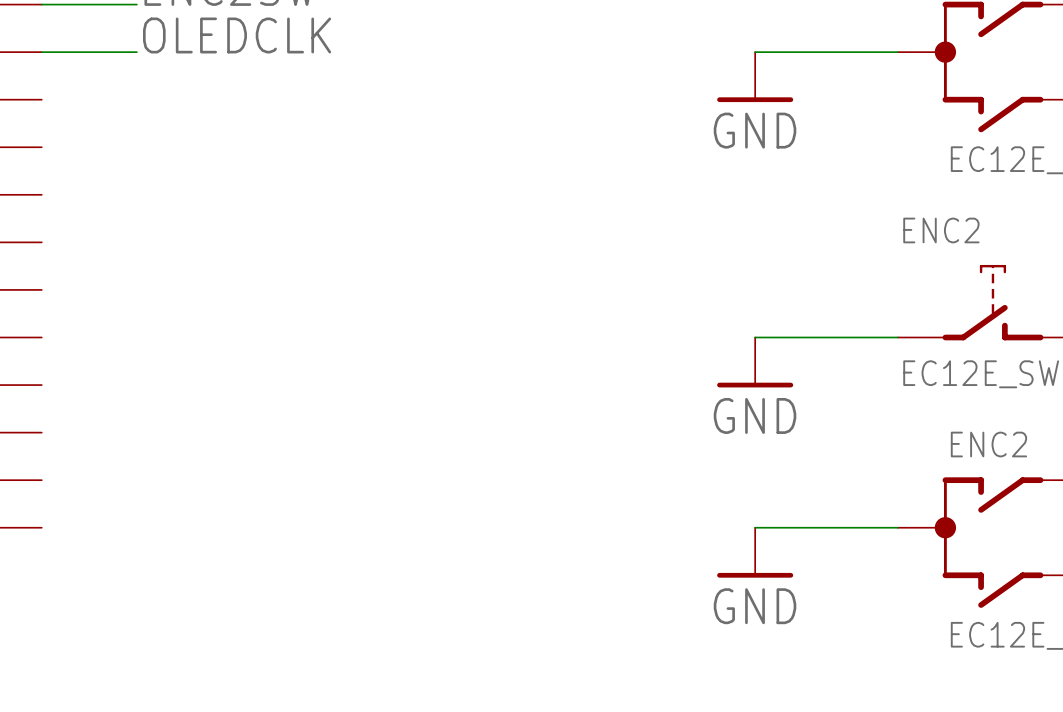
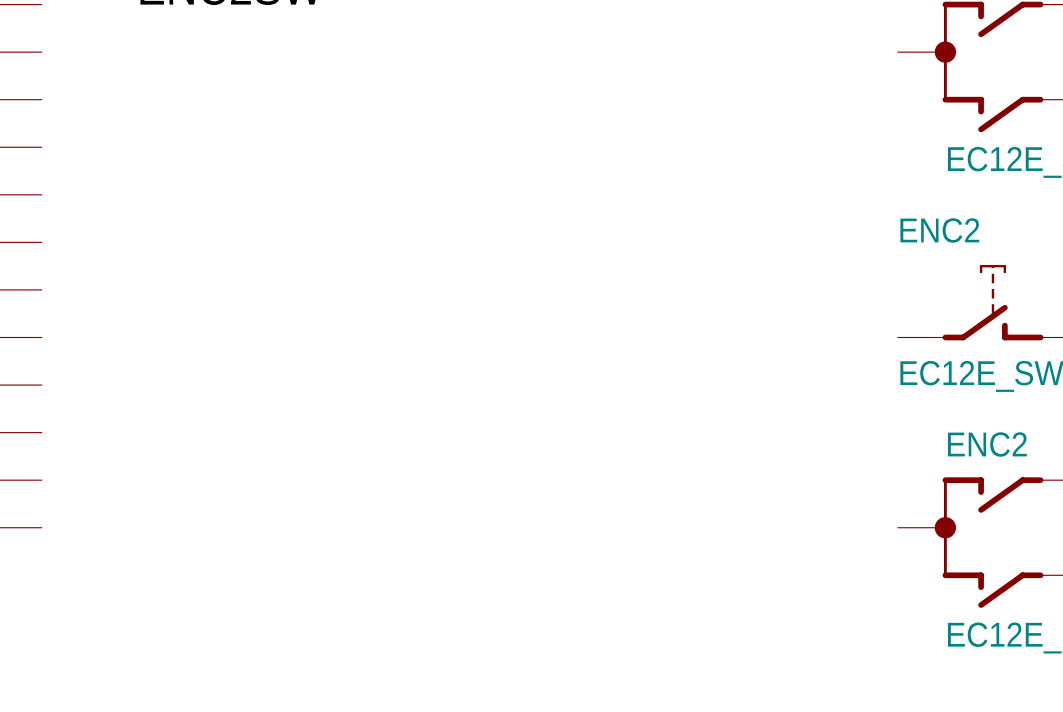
wire: (41, 4) (136, 4) -> none
label: OLEDCLK (237, 35) -> none
wire: (41, 52) (136, 52) -> none
wire: (755, 52) (897, 52) -> none
power symbol: GND (755, 77) -> none
wire: (755, 337) (897, 337) -> none
power symbol: GND (755, 362) -> none
wire: (755, 527) (897, 527) -> none
power symbol: GND (755, 552) -> none

